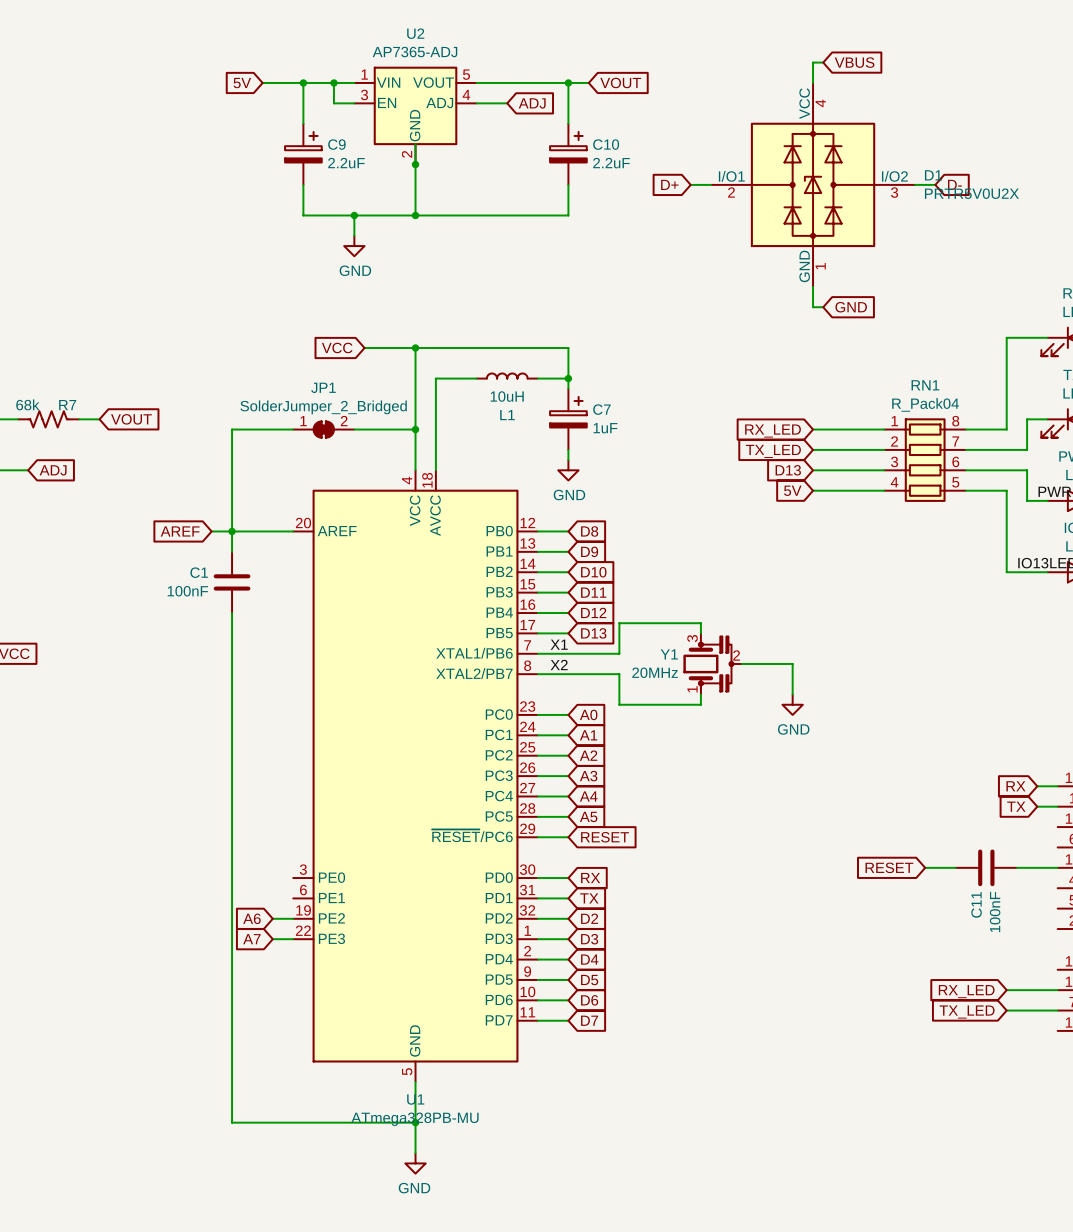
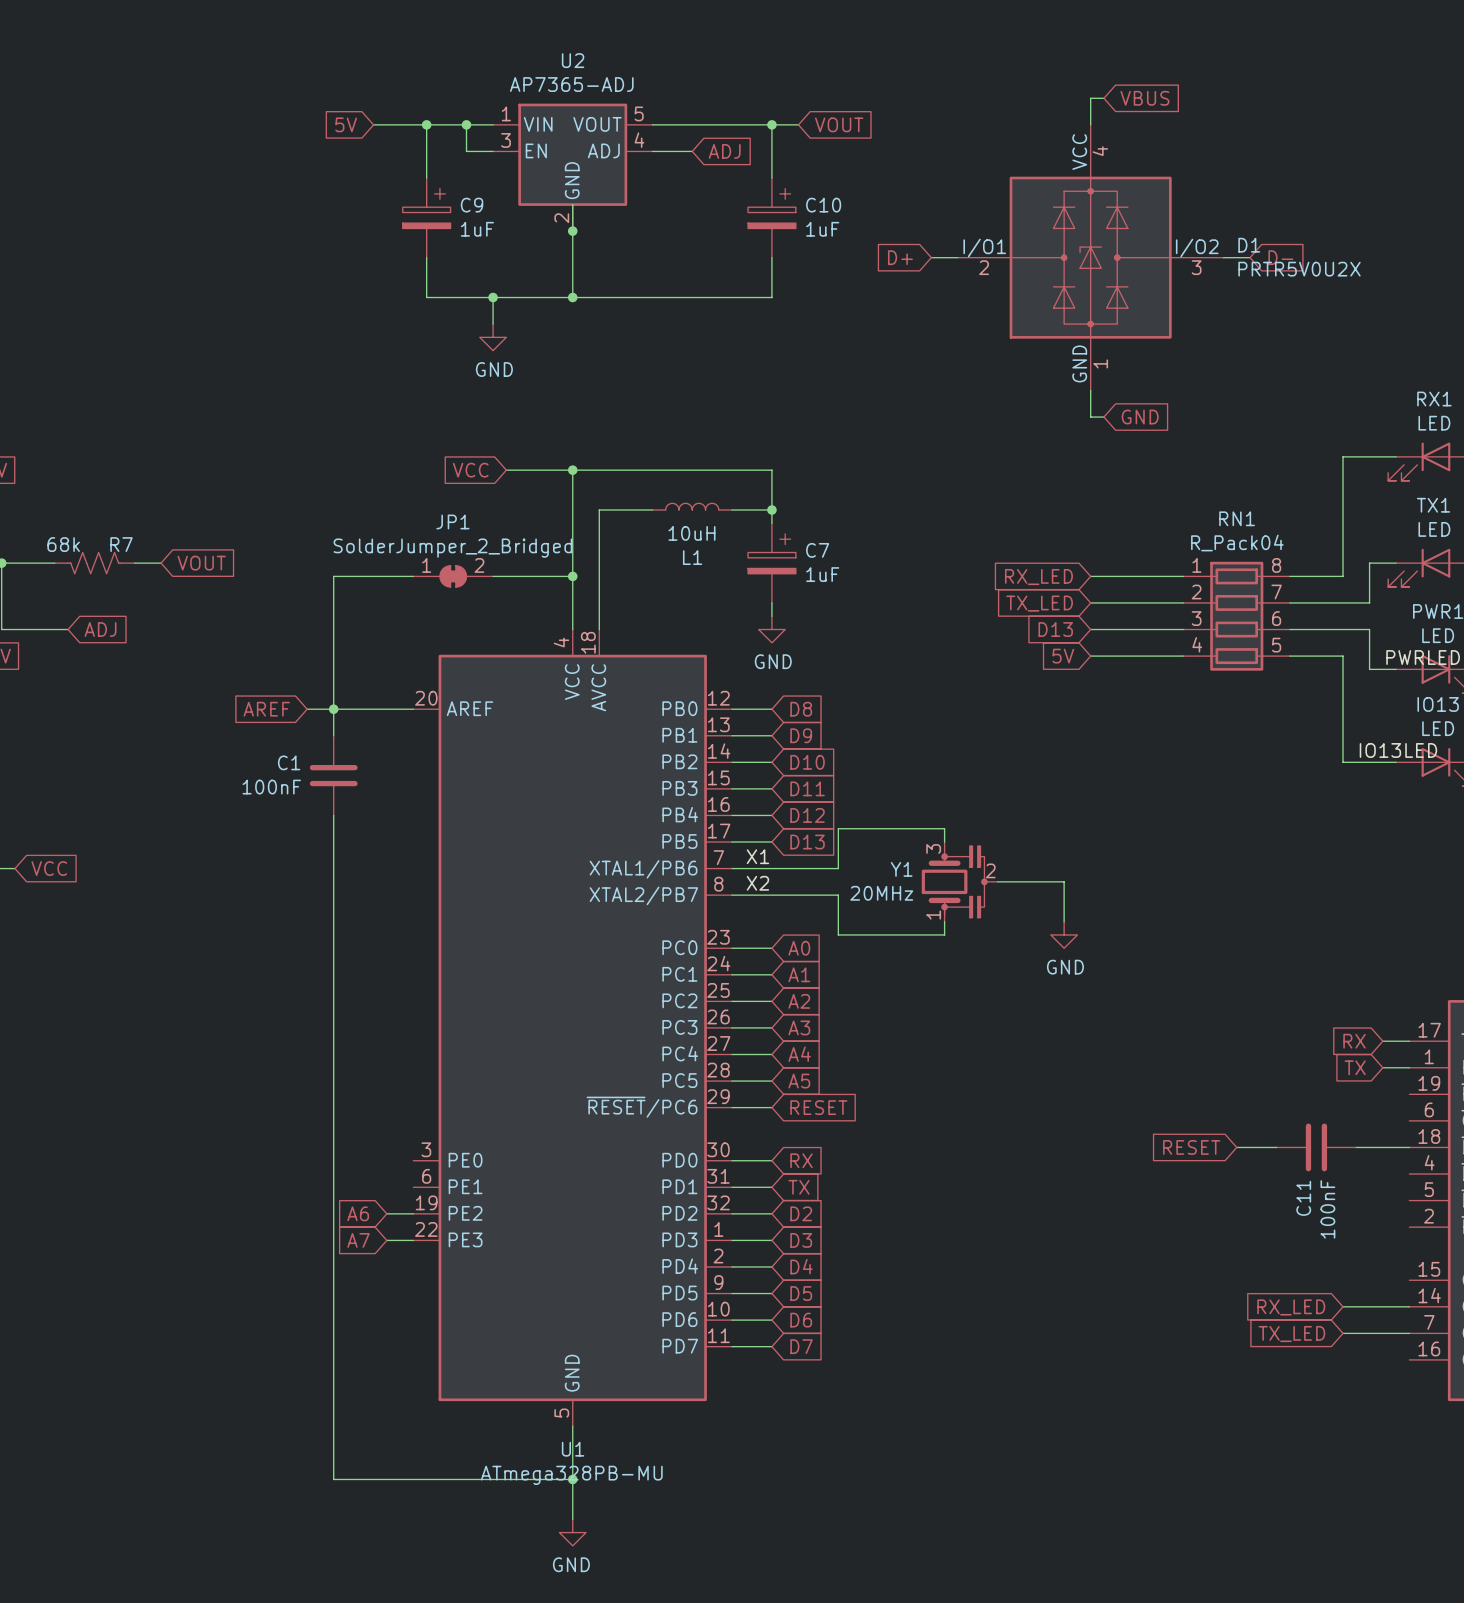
C9 value: 2.2uF (346, 163) -> 1uF (477, 229)
C10 value: 2.2uF (611, 163) -> 1uF (822, 229)

